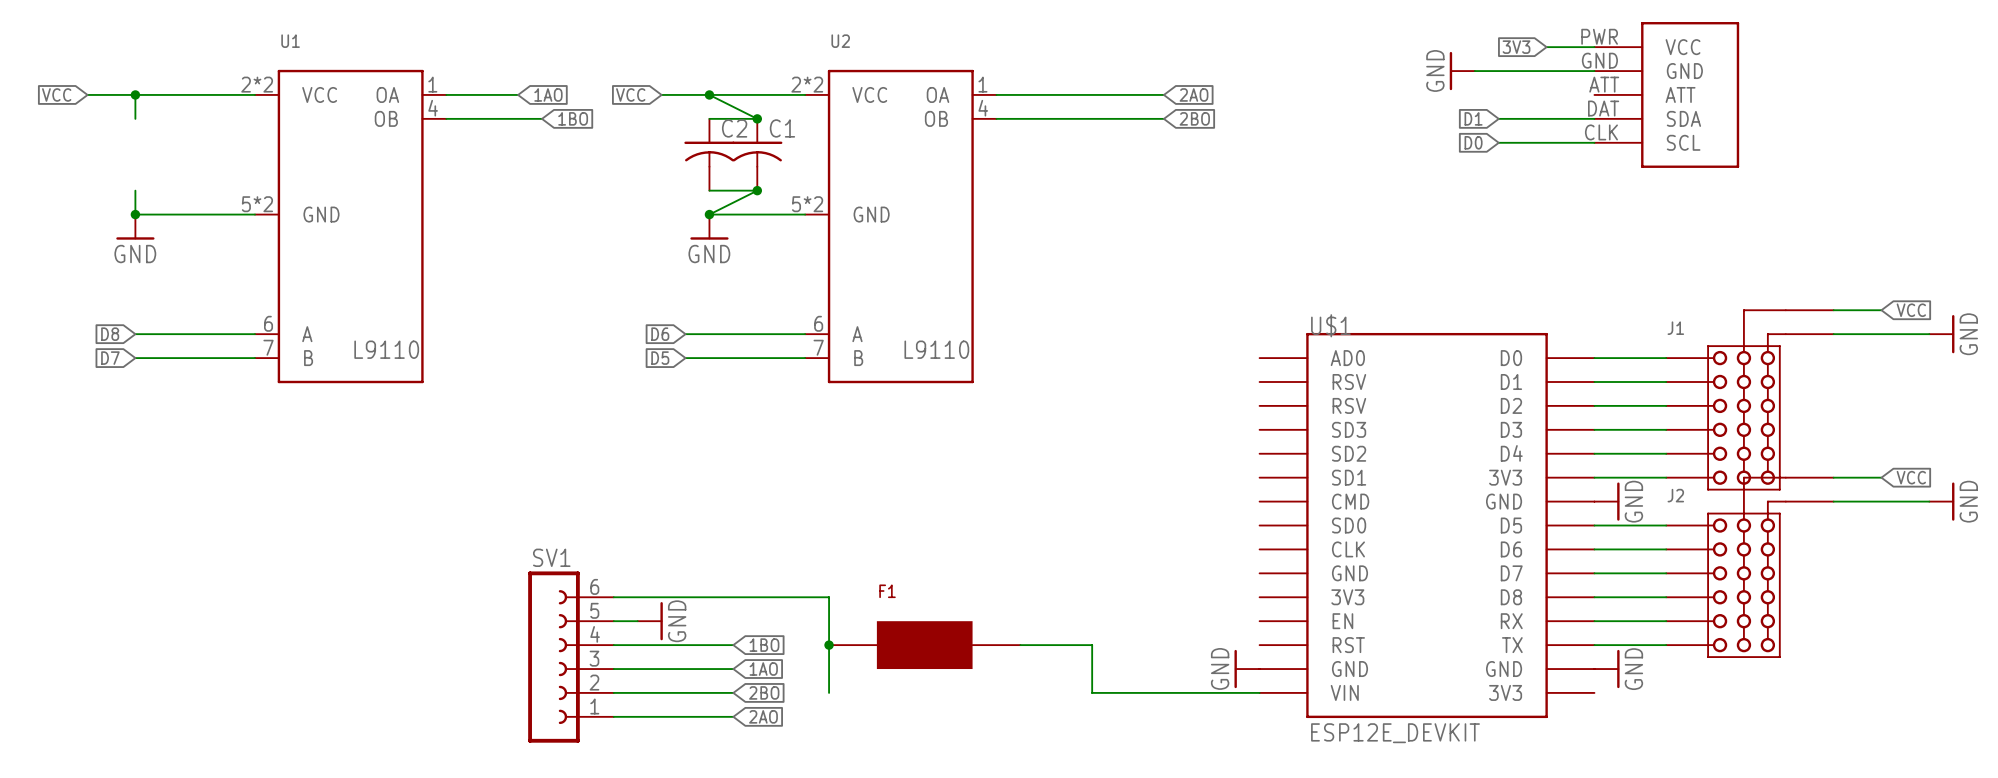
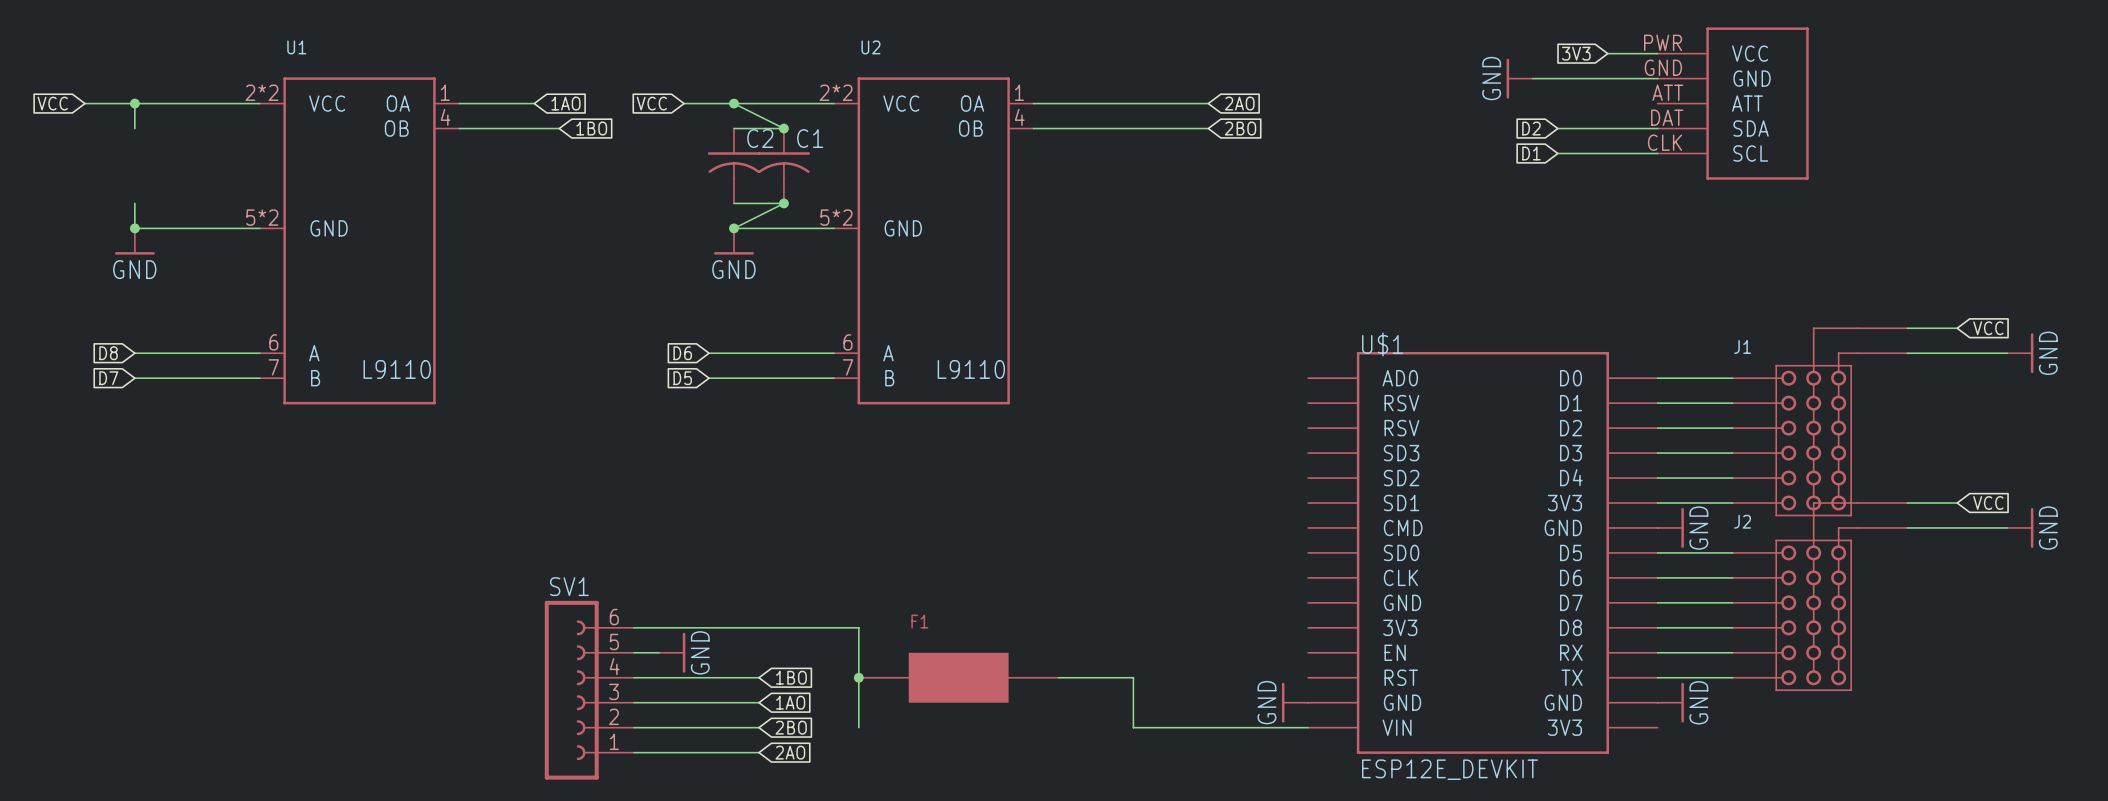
global label: D1 (1473, 118) -> D2 (1531, 128)
global label: D0 (1473, 142) -> D1 (1531, 153)

